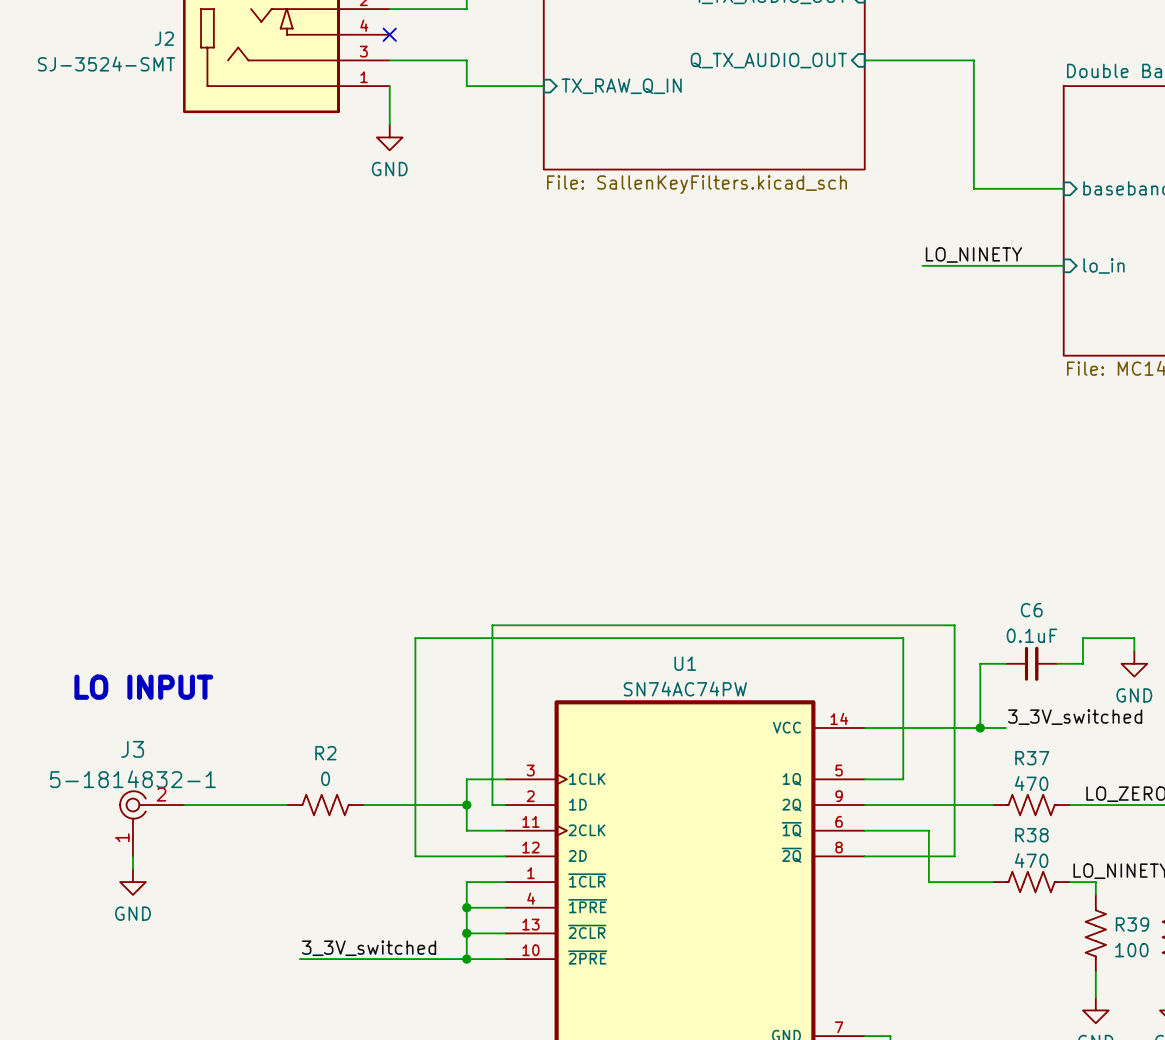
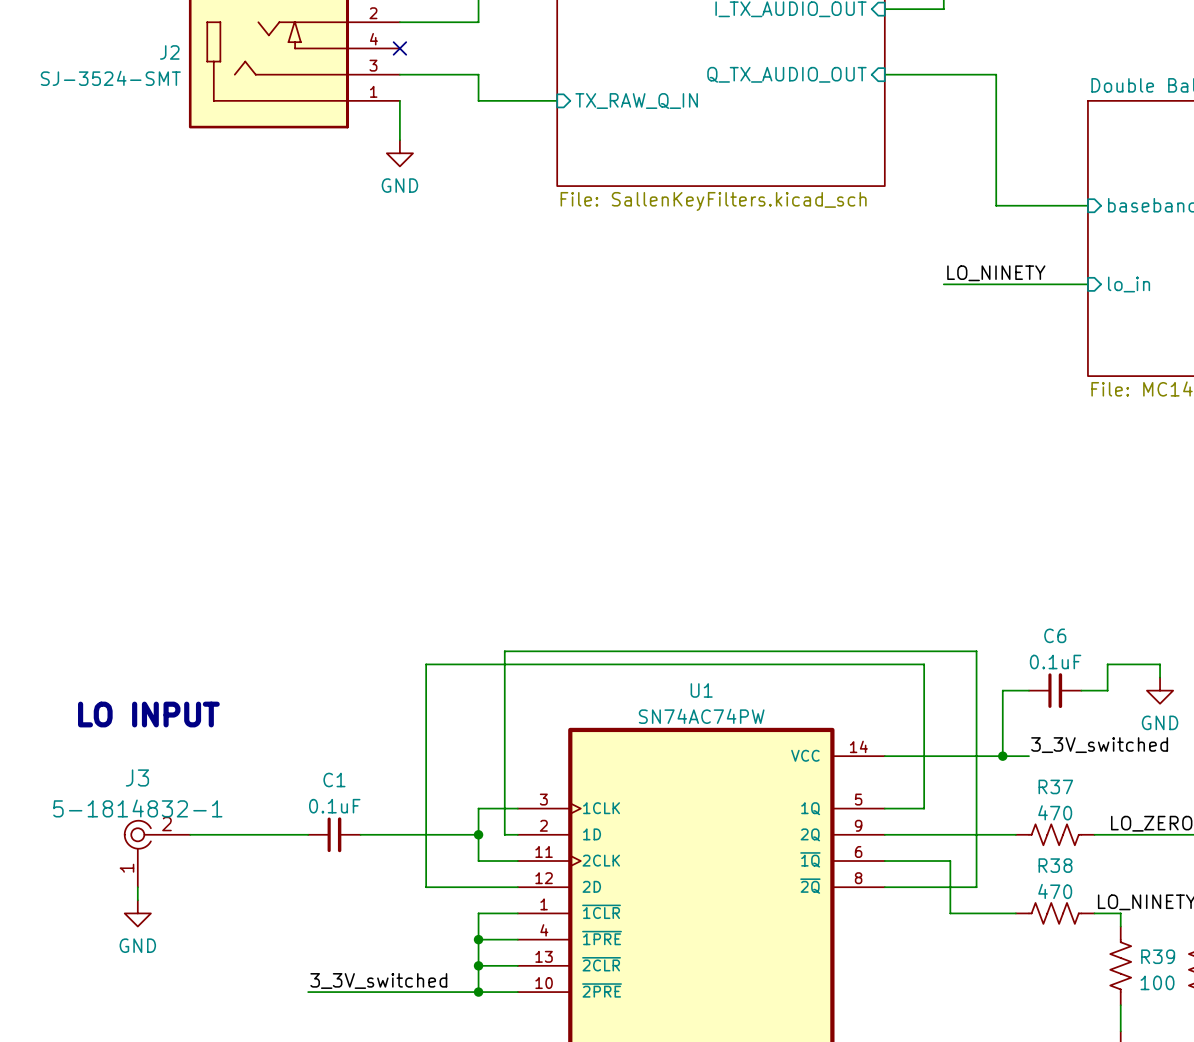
R2: 0 (325, 805) -> none
C1: none -> 0.1uF (334, 834)

